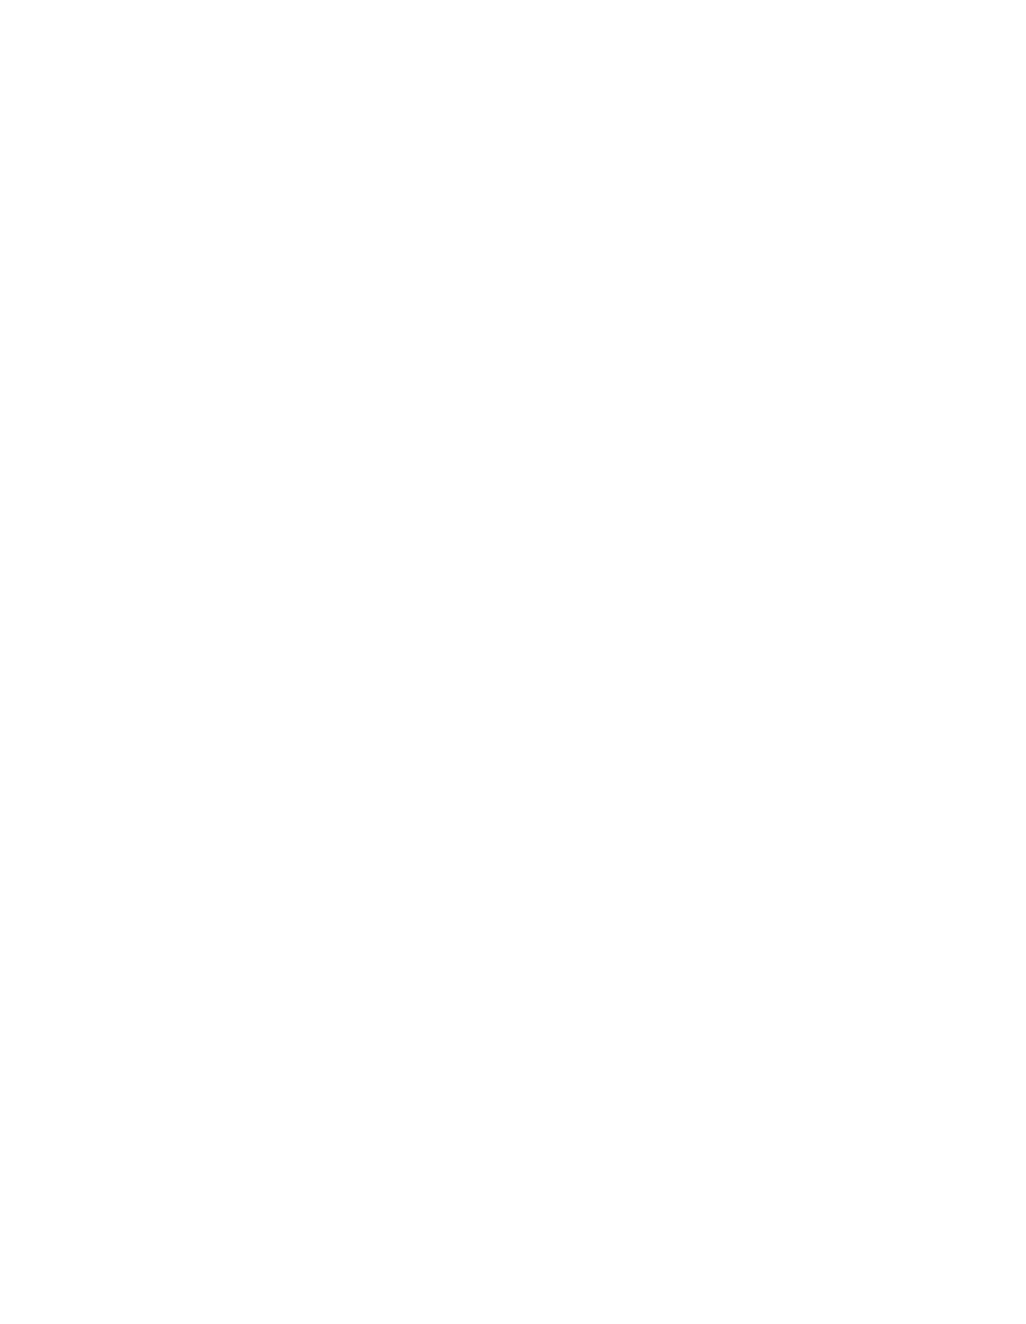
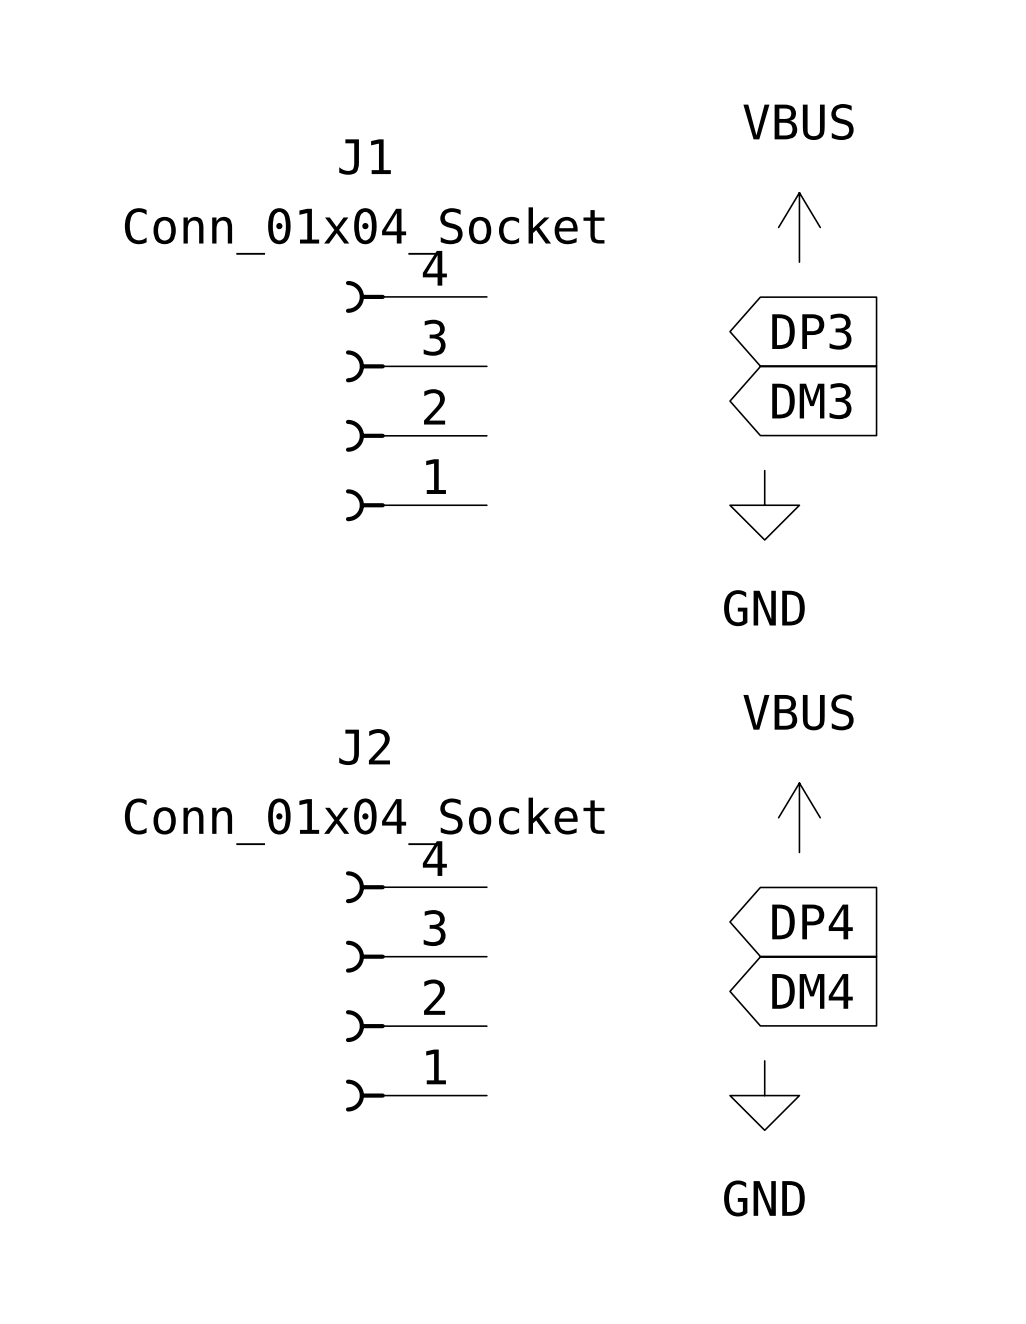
power symbol: none -> VBUS (799, 227)
global label: none -> DP3 (811, 331)
J1: none -> Conn_01x04_Socket (416, 401)
global label: none -> DM3 (811, 401)
power symbol: none -> GND (764, 505)
power symbol: none -> VBUS (799, 817)
global label: none -> DP4 (812, 921)
global label: none -> DM4 (812, 991)
J2: none -> Conn_01x04_Socket (416, 991)
power symbol: none -> GND (764, 1095)

